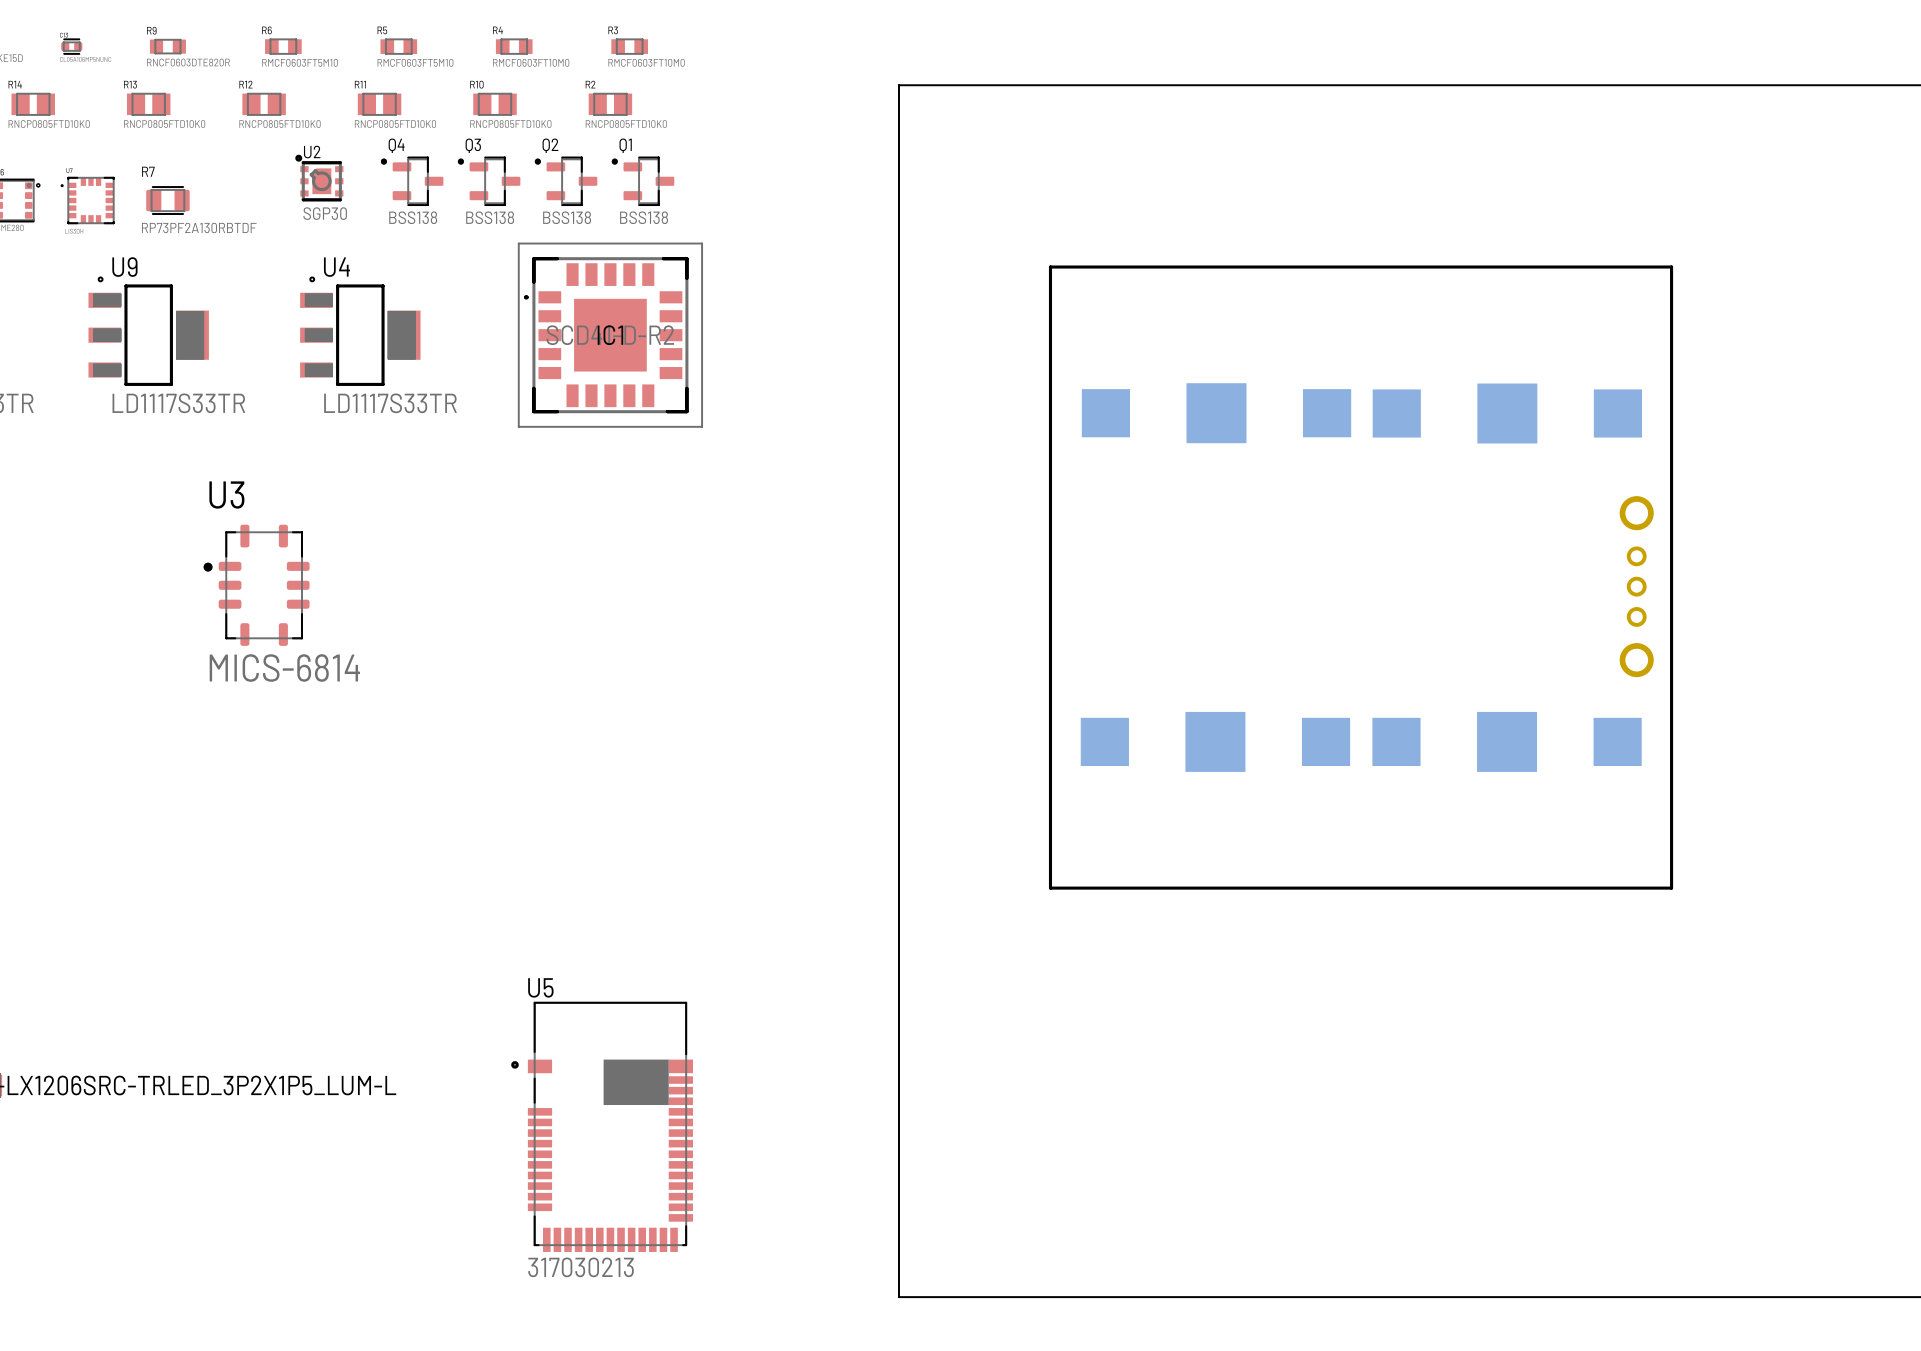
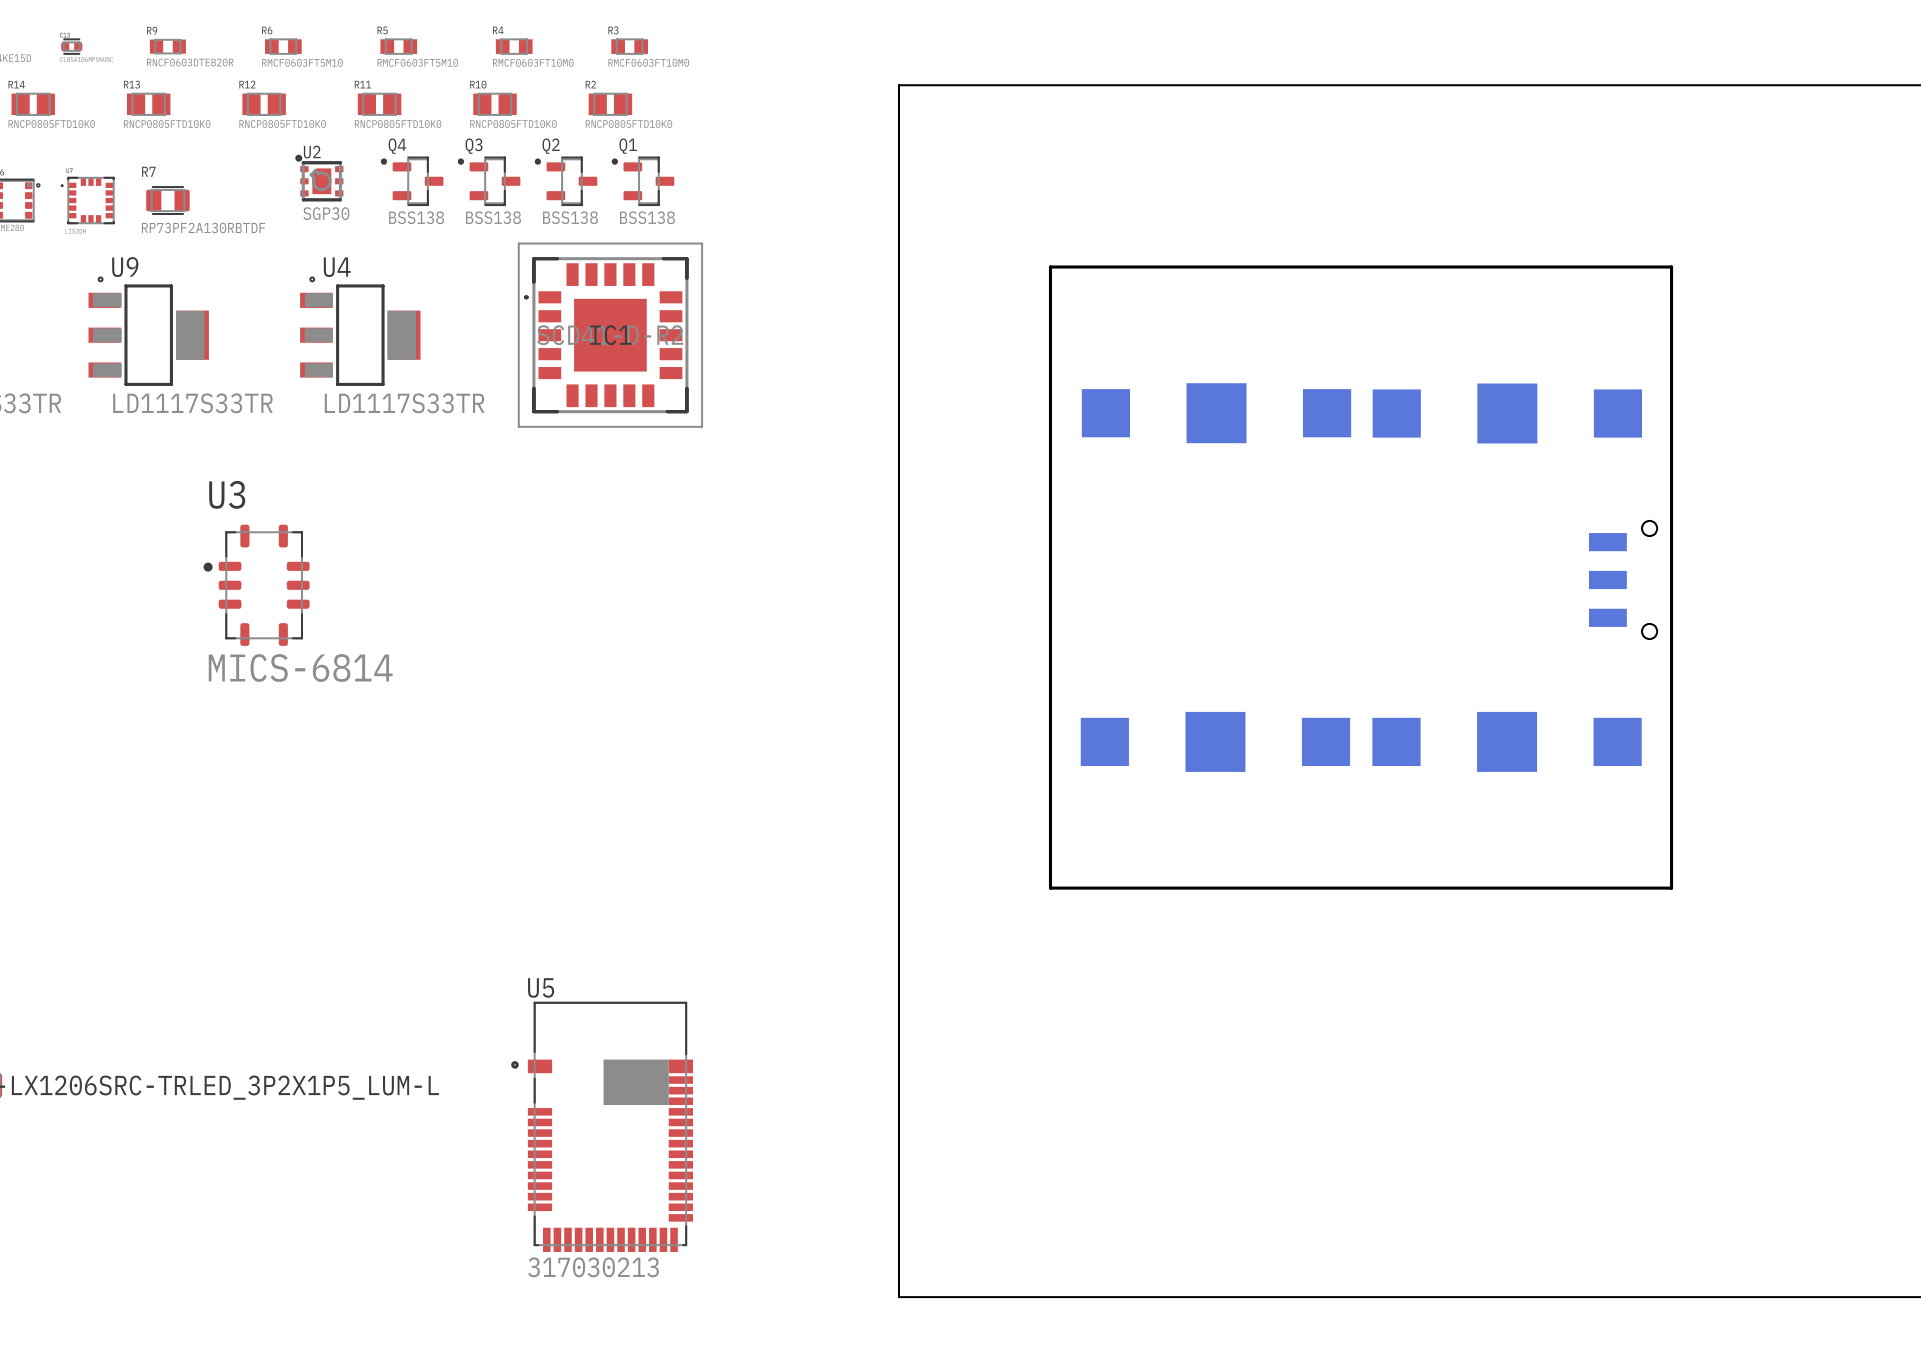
part: none -> (1623, 579)
part: (1636, 586) -> none

